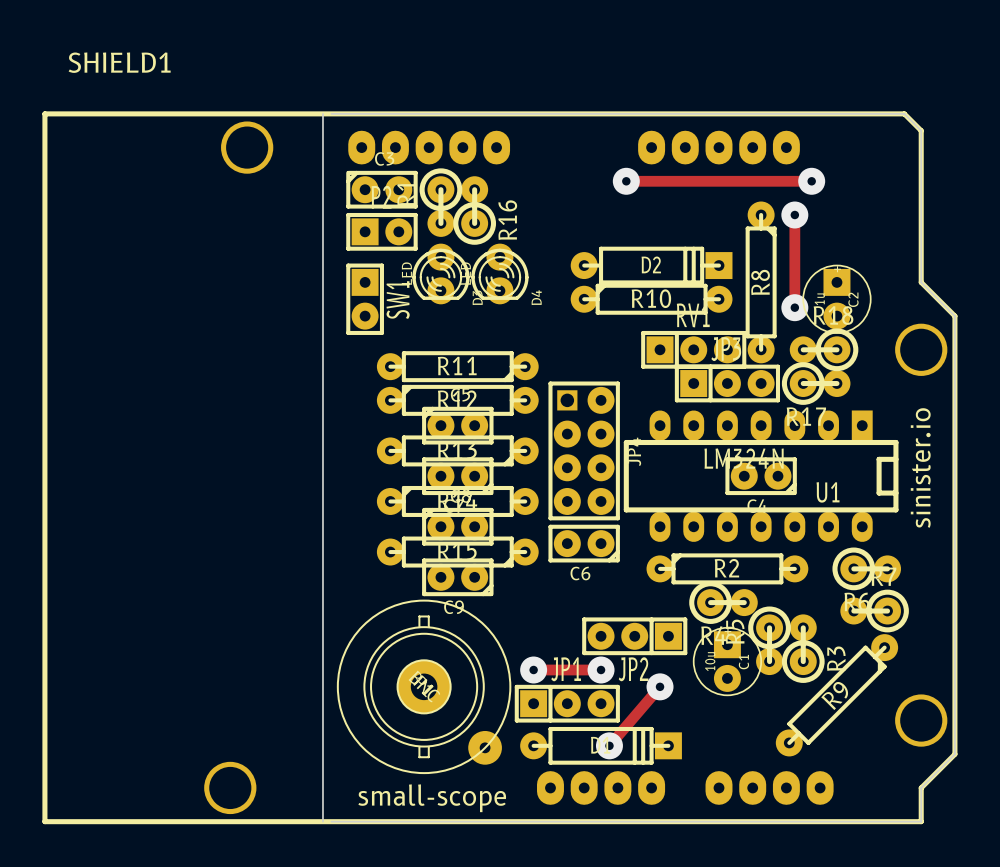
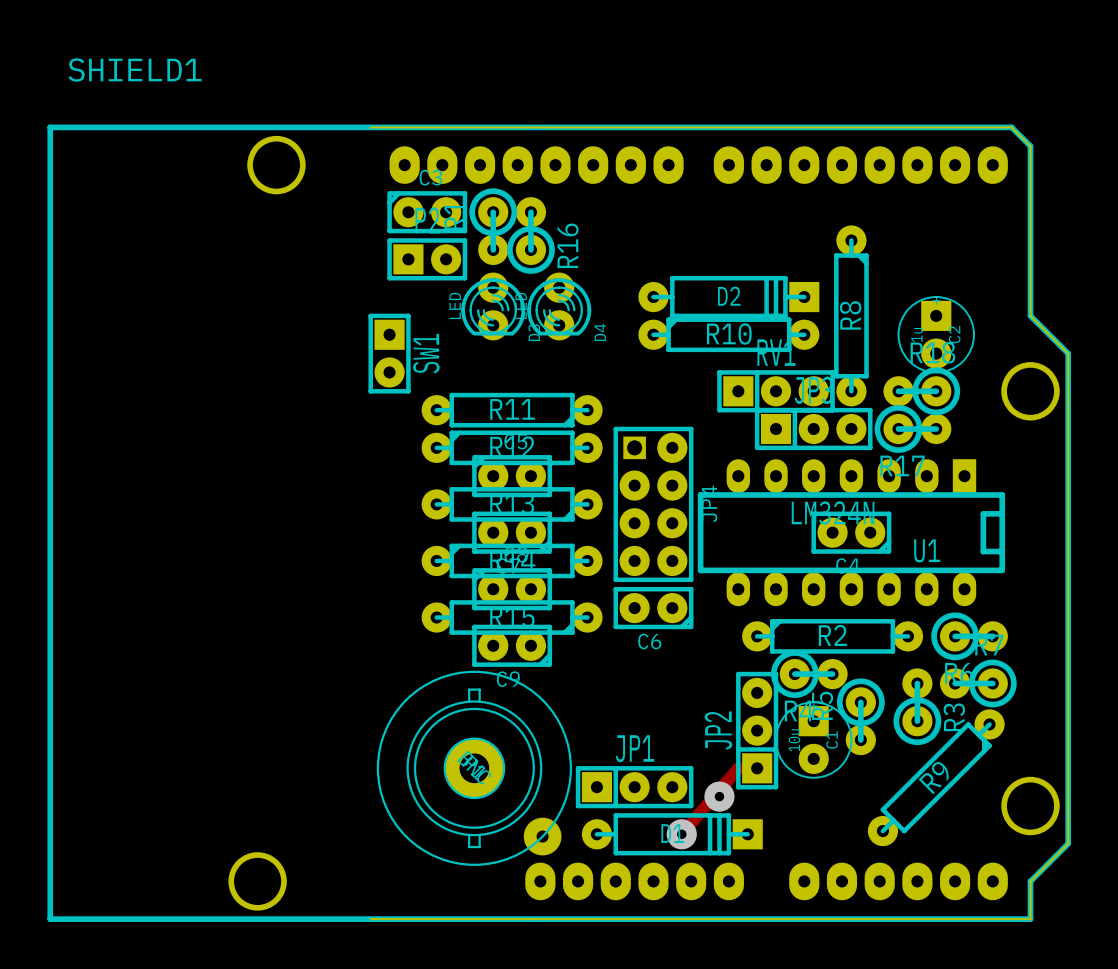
SHIELD1 footprint: [42, 111, 958, 825] -> [47, 124, 1072, 922]
board edge: (322, 113) (322, 821) -> none
track: (626, 181) (811, 181) -> none
via: (626, 181) -> none
via: (811, 181) -> none
track: (794, 214) (794, 307) -> none
via: (794, 214) -> none
SW1 position: (365, 299) -> (389, 353)
via: (794, 307) -> none
text: sinister.io (920, 468) -> none
R2 position: (727, 568) -> (832, 636)
JP2 rotation: 0° (634, 636) -> 90° clockwise (757, 730)
R3 position: (803, 648) -> (917, 706)
track: (533, 670) (601, 670) -> none
via: (533, 670) -> none
via: (601, 670) -> none
via: (660, 686) -> none
via: none -> (719, 796)
text: small-scope (432, 798) -> none

